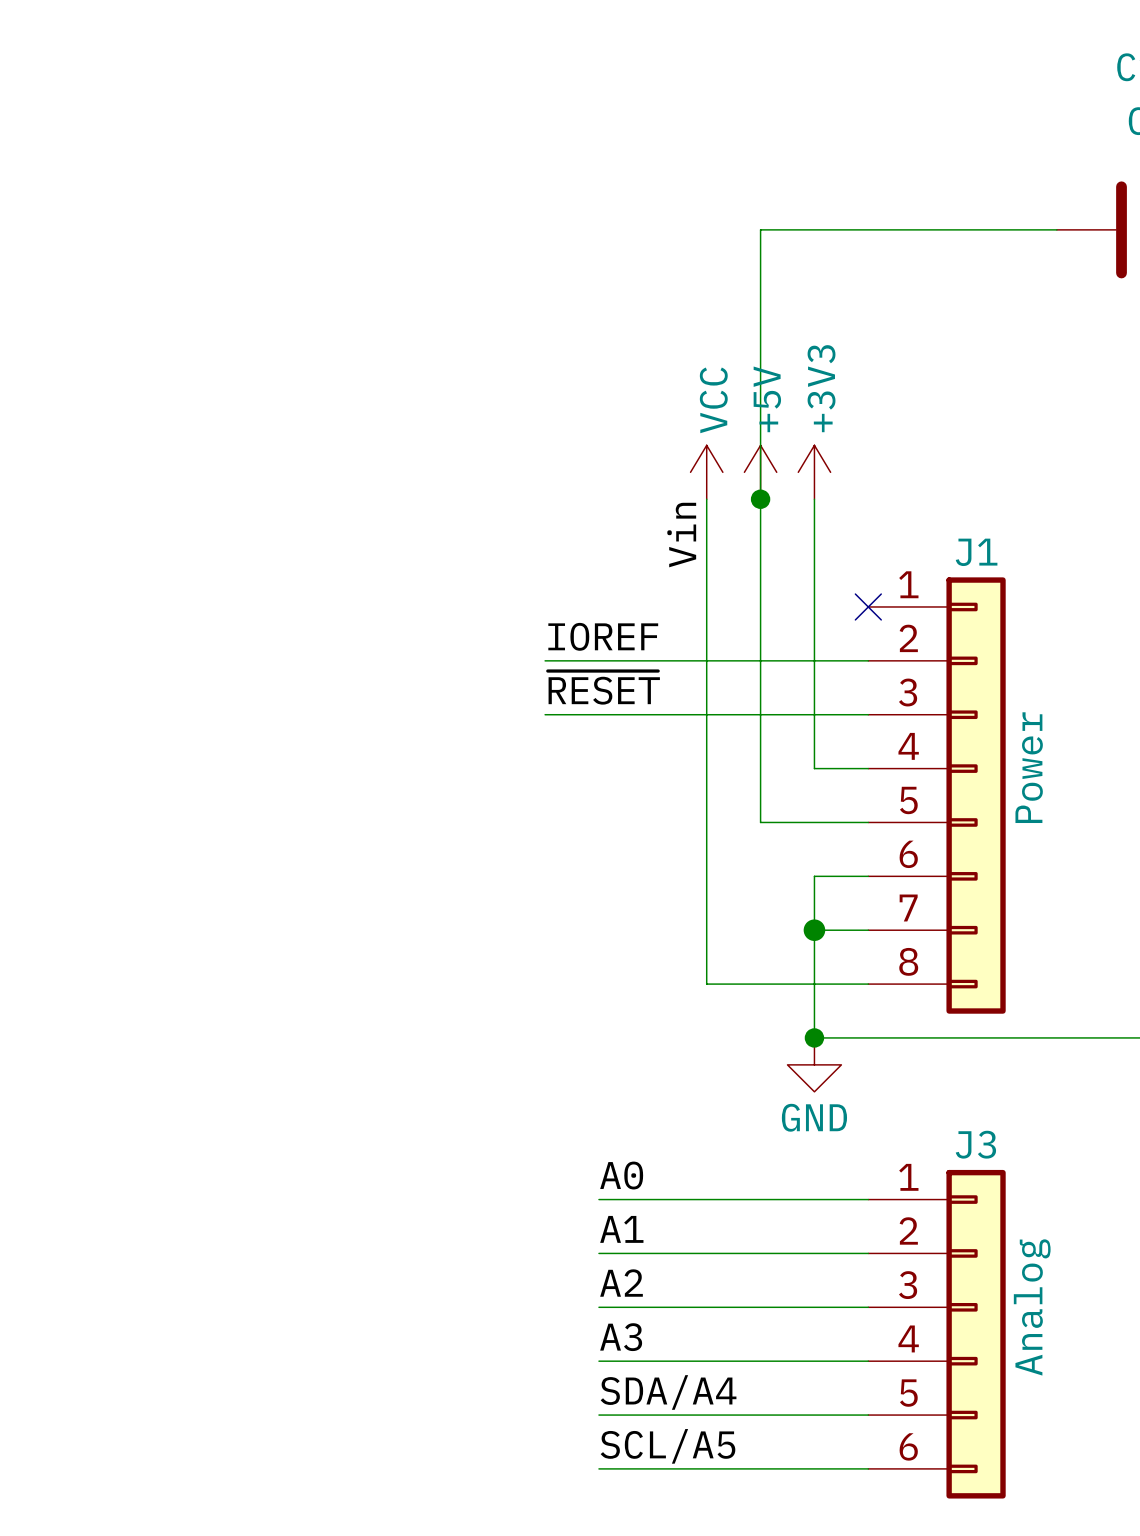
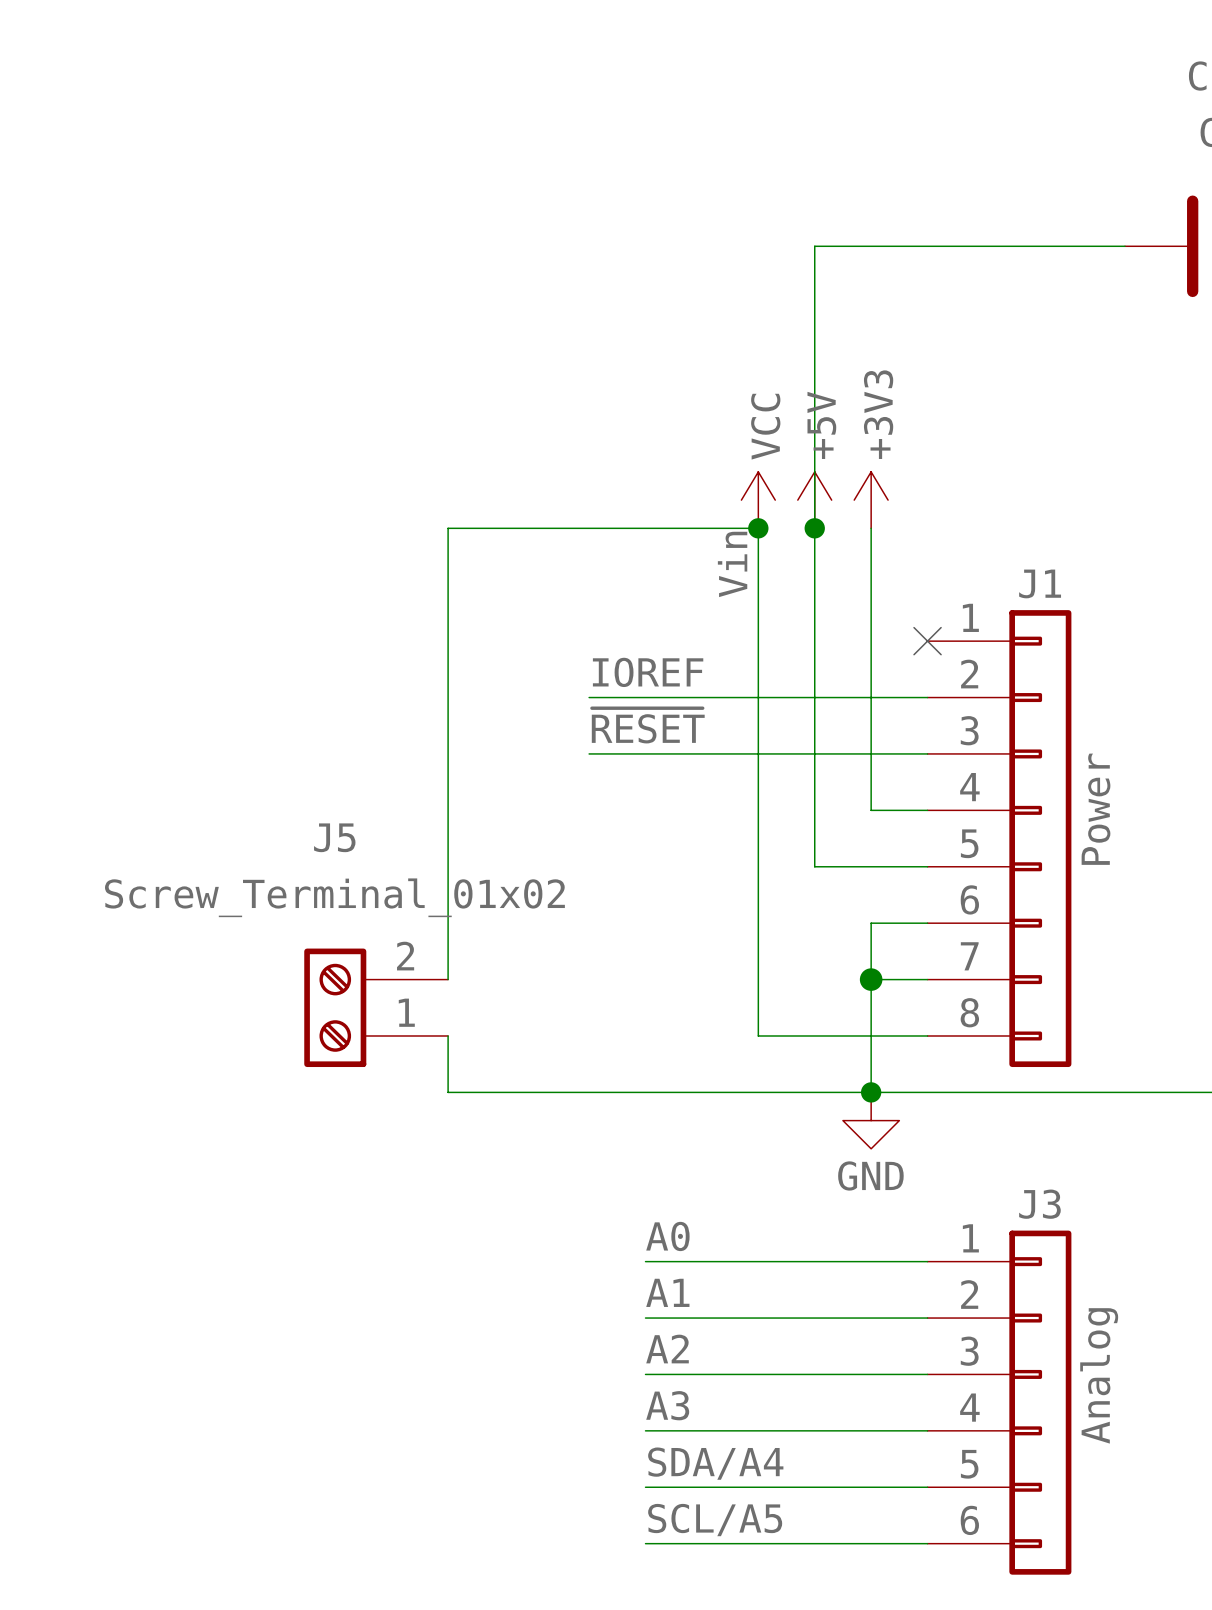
wire: none -> (758, 528) (448, 528) (448, 979)
junction: none -> (758, 528)
J5: none -> Screw_Terminal_01x02 (376, 1007)
wire: none -> (448, 1035) (448, 1092) (871, 1092)

